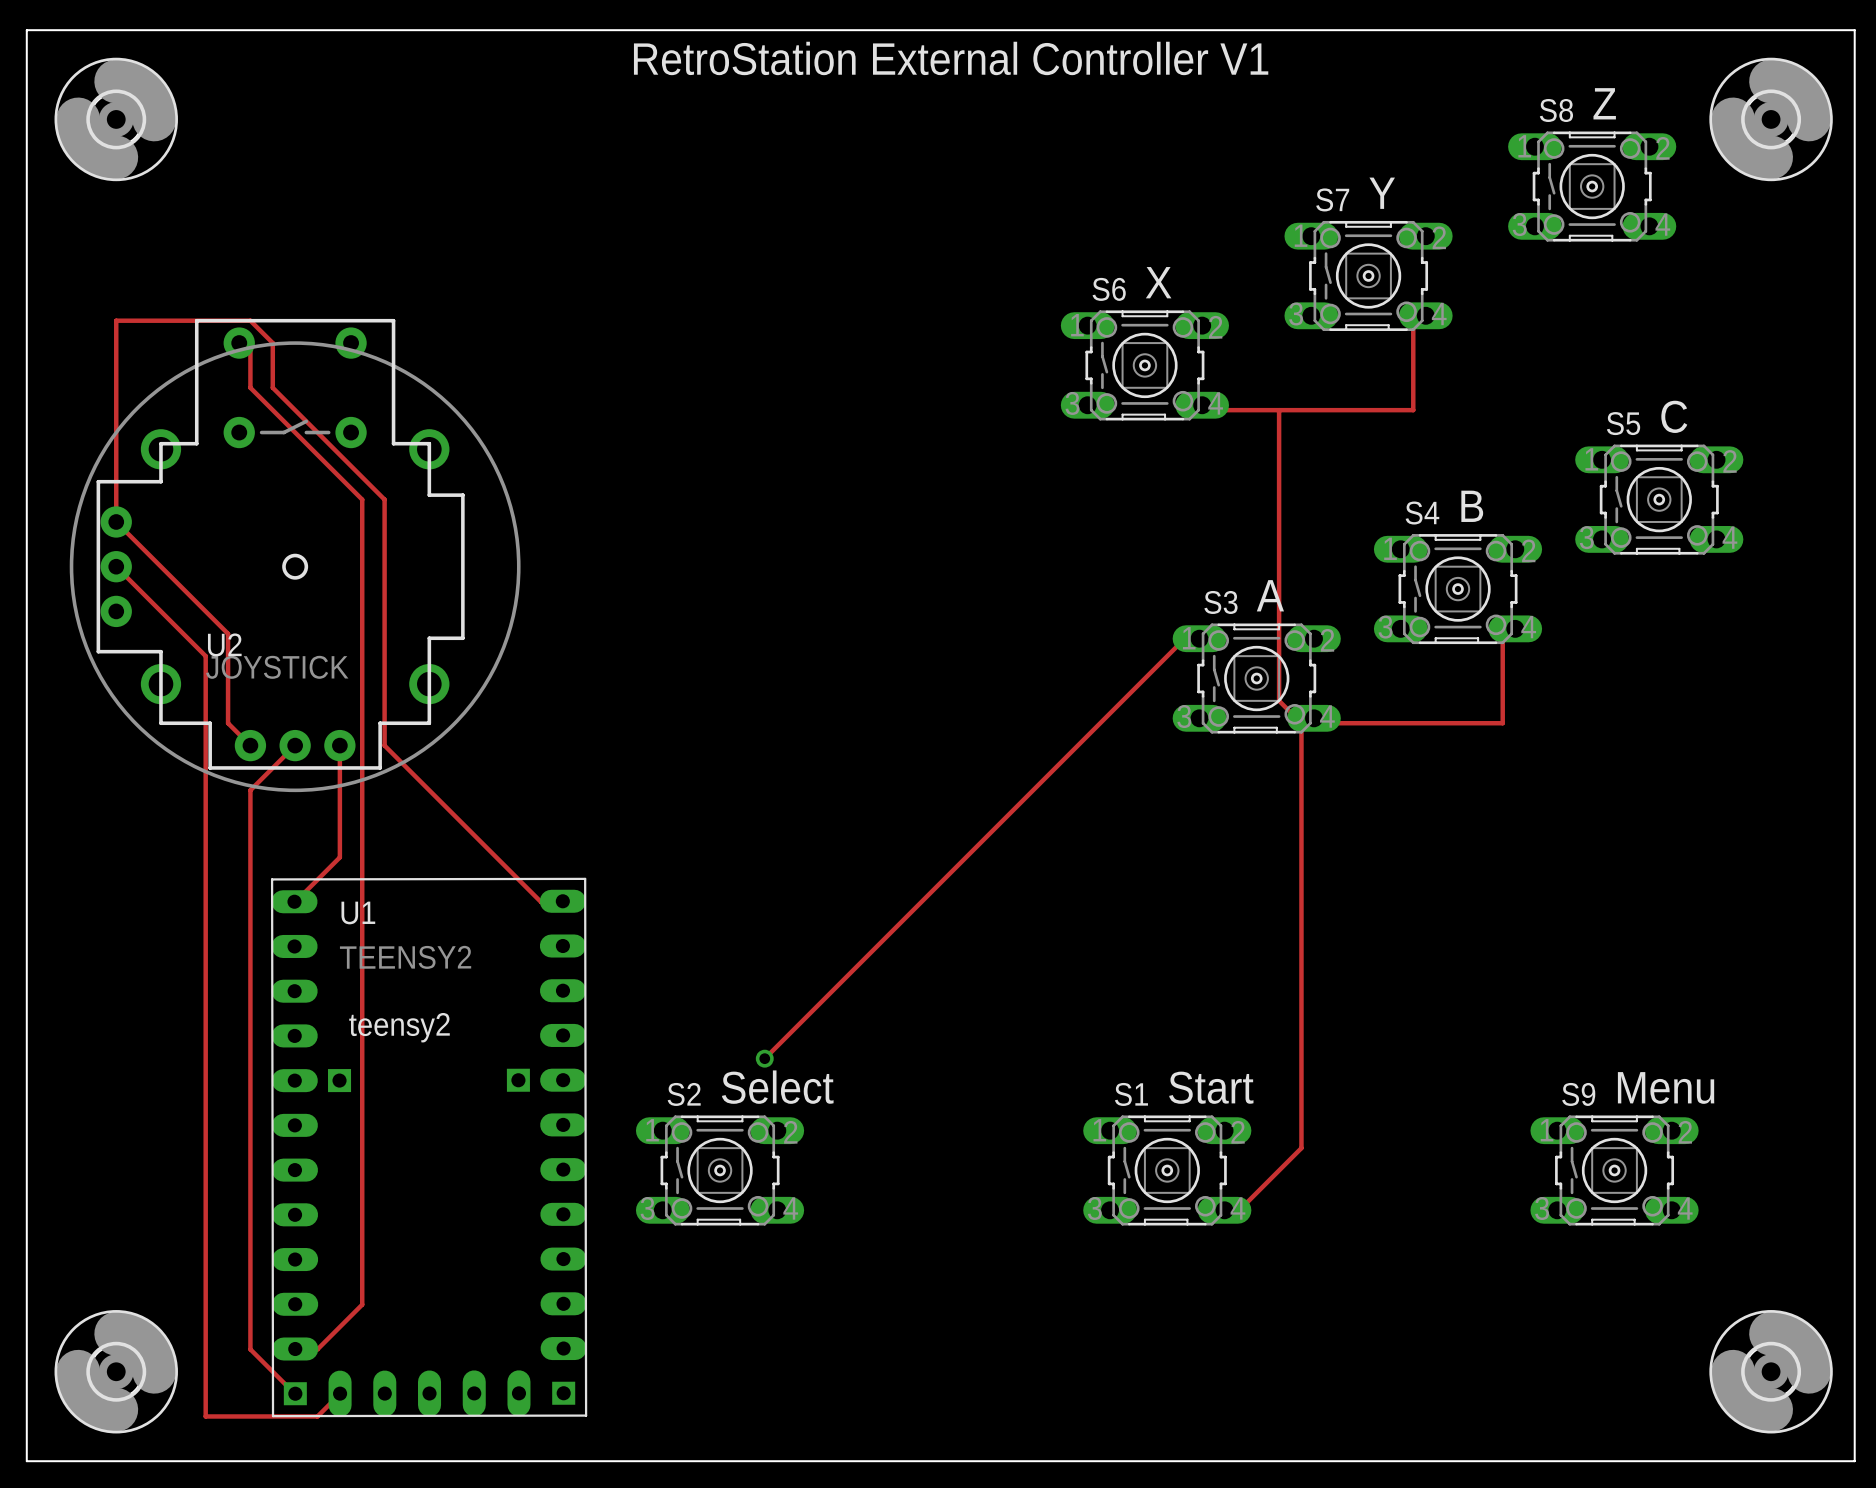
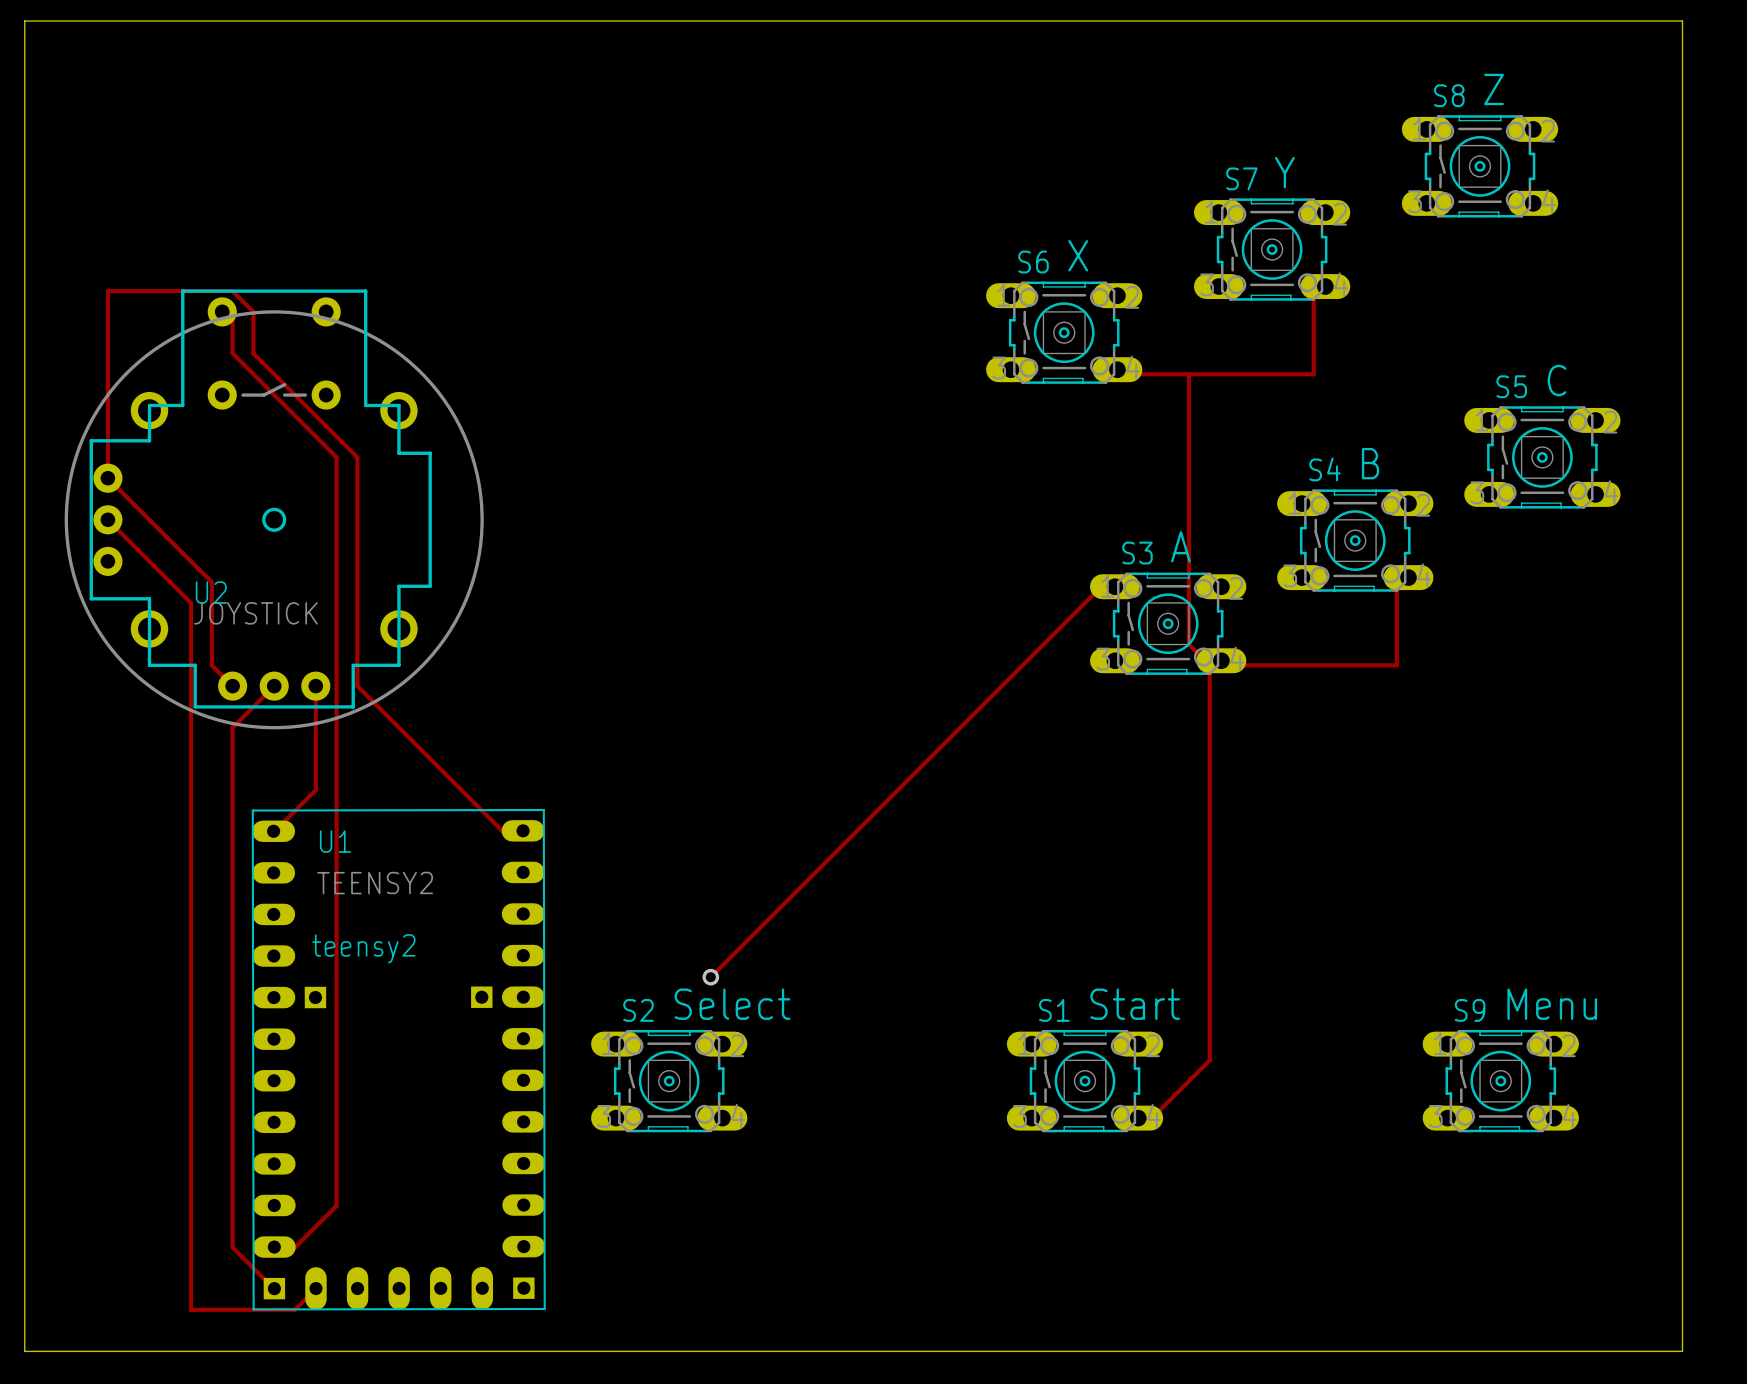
board edge: (1809, 30) (1854, 30) (1854, 1461) (1809, 1461) -> (1682, 21) (1682, 1351)
text: RetroStation External Controller V1 (951, 58) -> none
part: (116, 119) -> none
part: (1771, 119) -> none
part: (116, 1371) -> none
part: (1771, 1371) -> none

